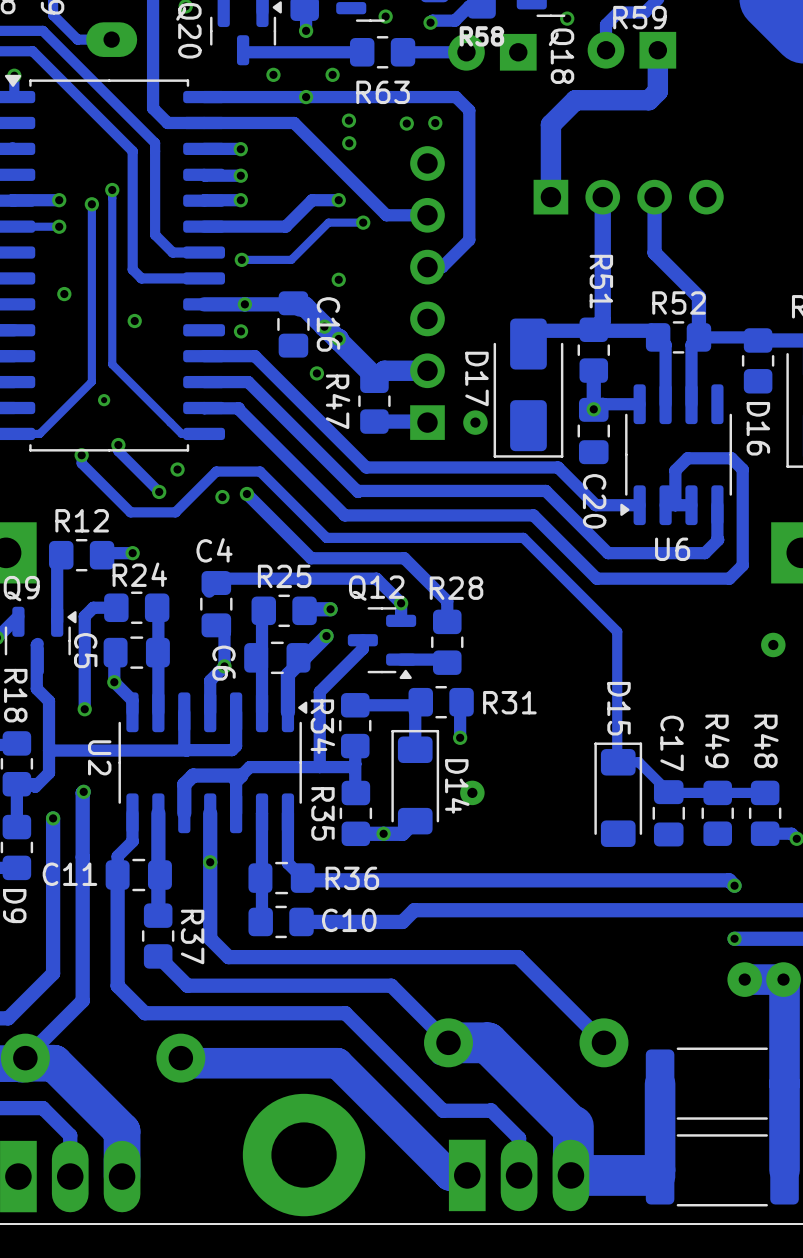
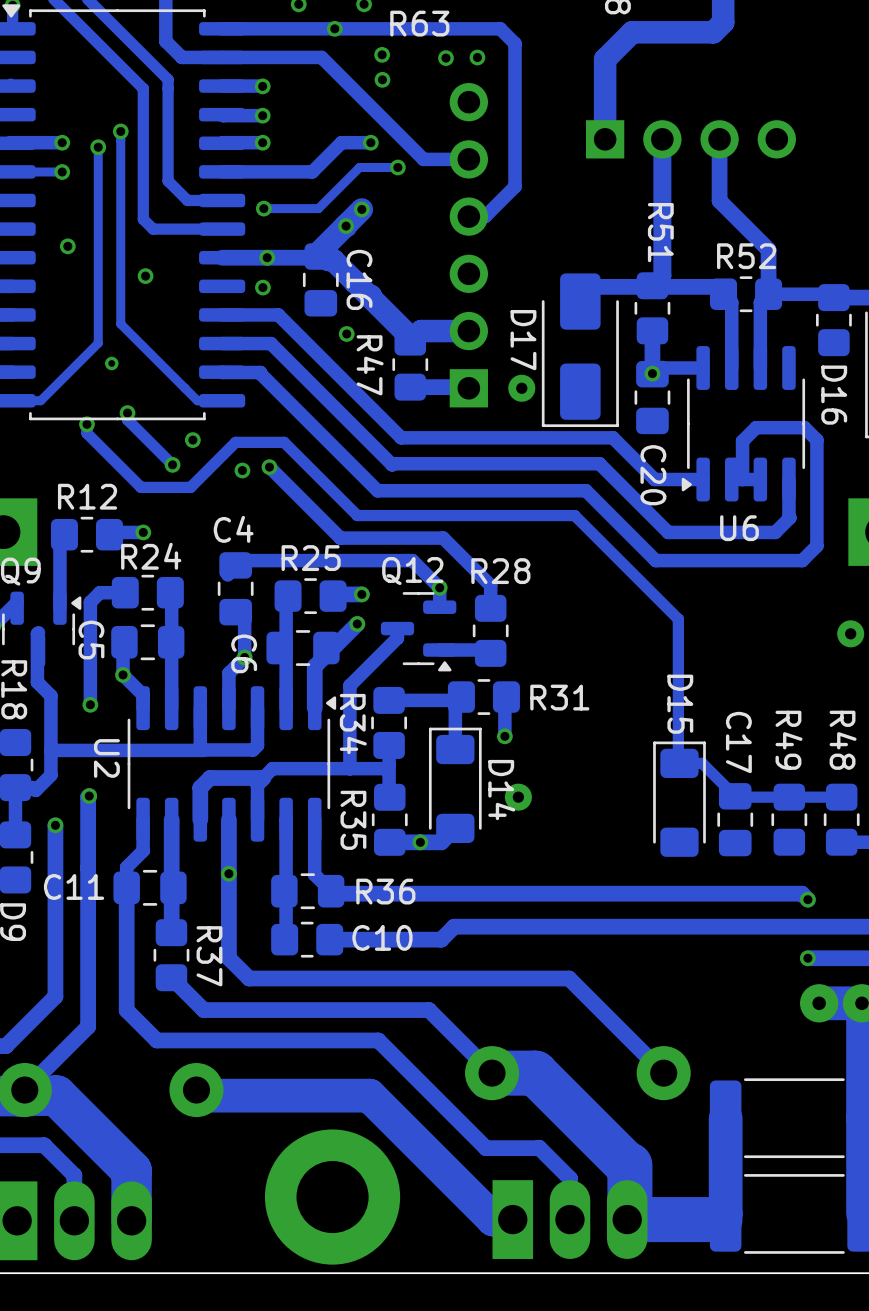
track: none -> (361, 209) (316, 254)
via: none -> (361, 209)
via: none -> (346, 226)
via: (338, 279) -> none
via: (324, 326) -> none
via: (338, 338) -> none

